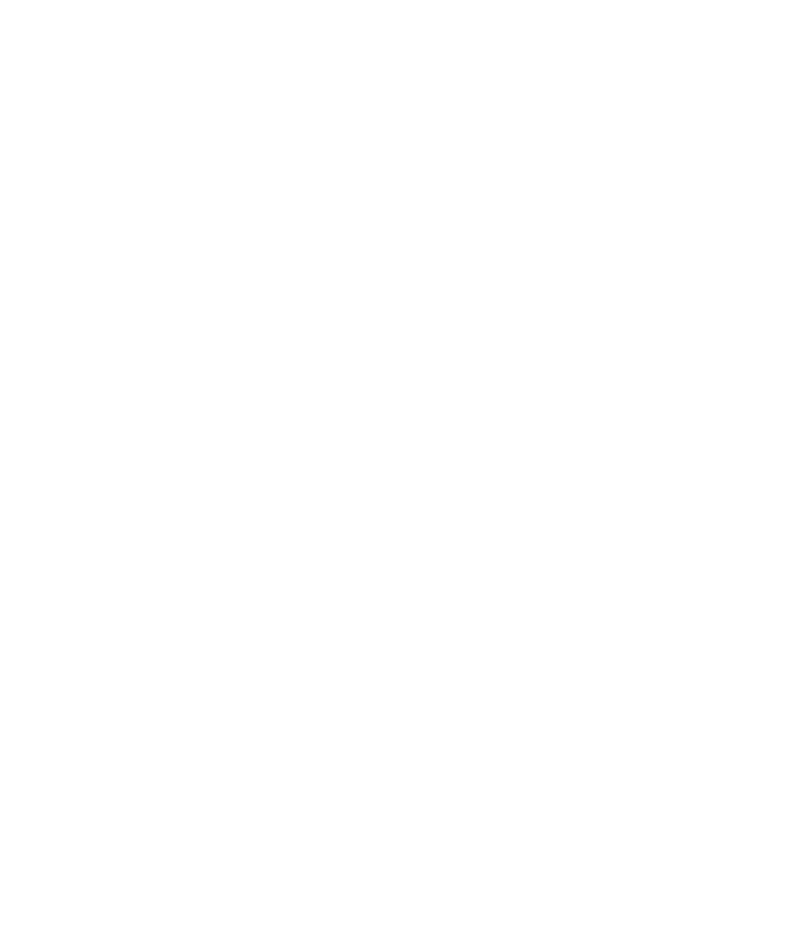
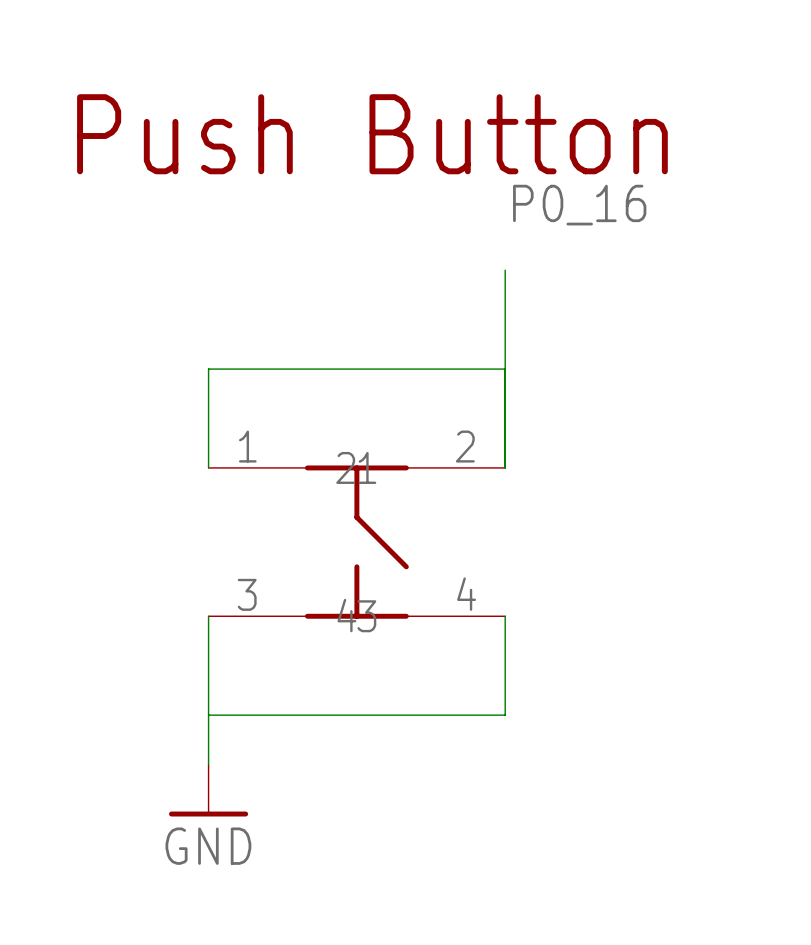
text: none -> Push Button (372, 134)
label: none -> P0_16 (579, 205)
wire: none -> (505, 270) (505, 467)
wire: none -> (505, 369) (208, 369) (208, 467)
part: none -> (356, 542)
wire: none -> (208, 616) (208, 764)
wire: none -> (505, 616) (505, 715) (208, 715)
power symbol: none -> GND (208, 790)

